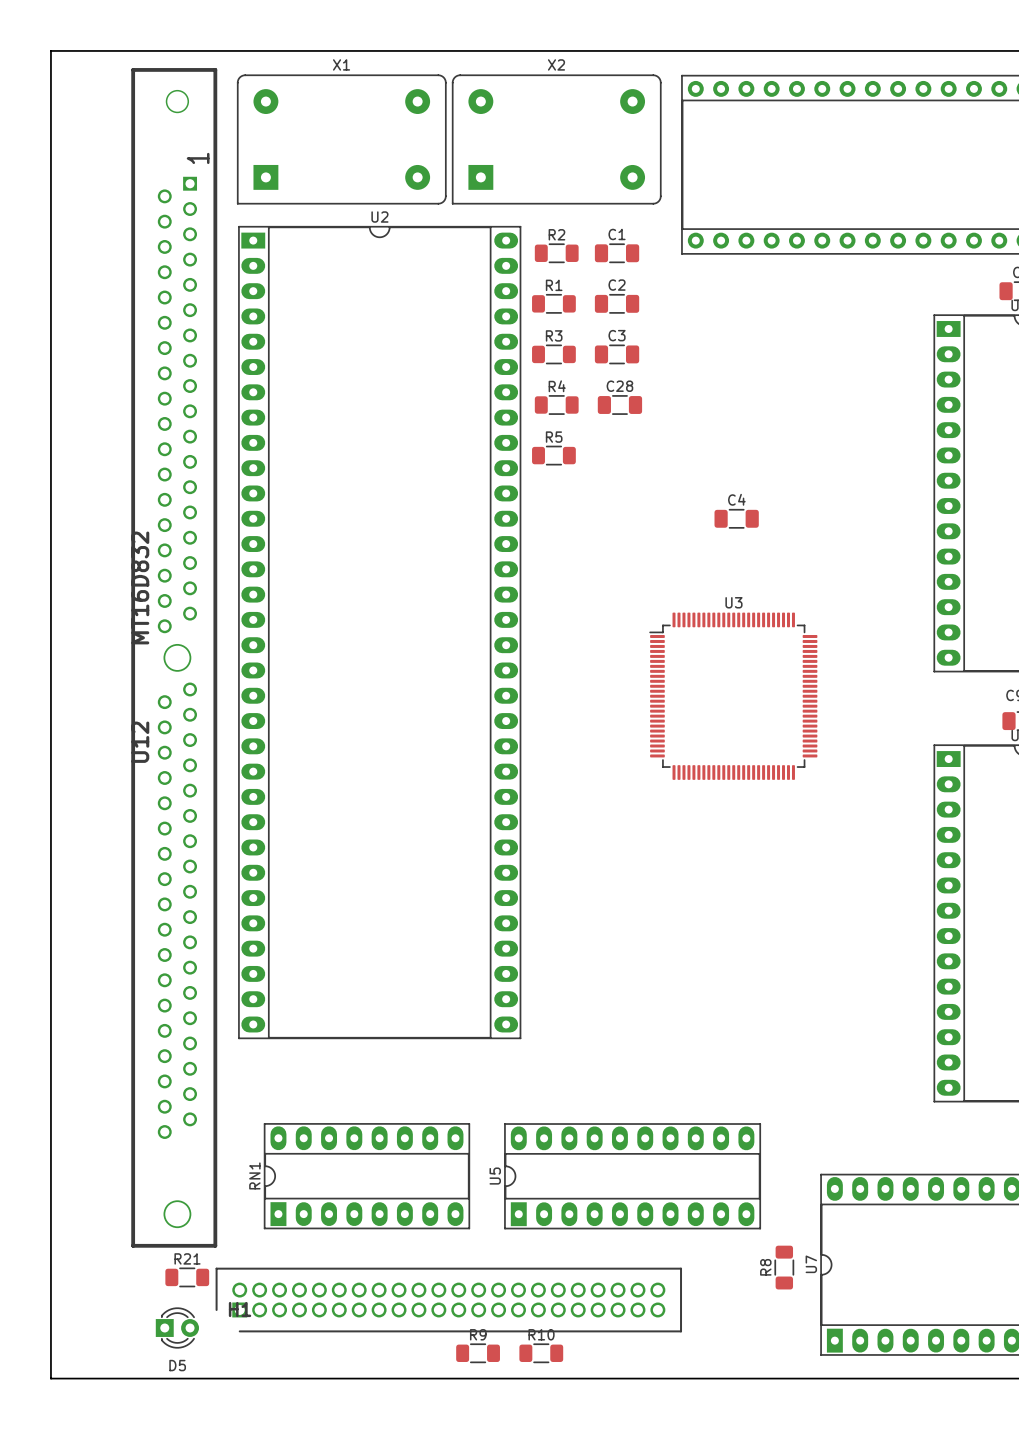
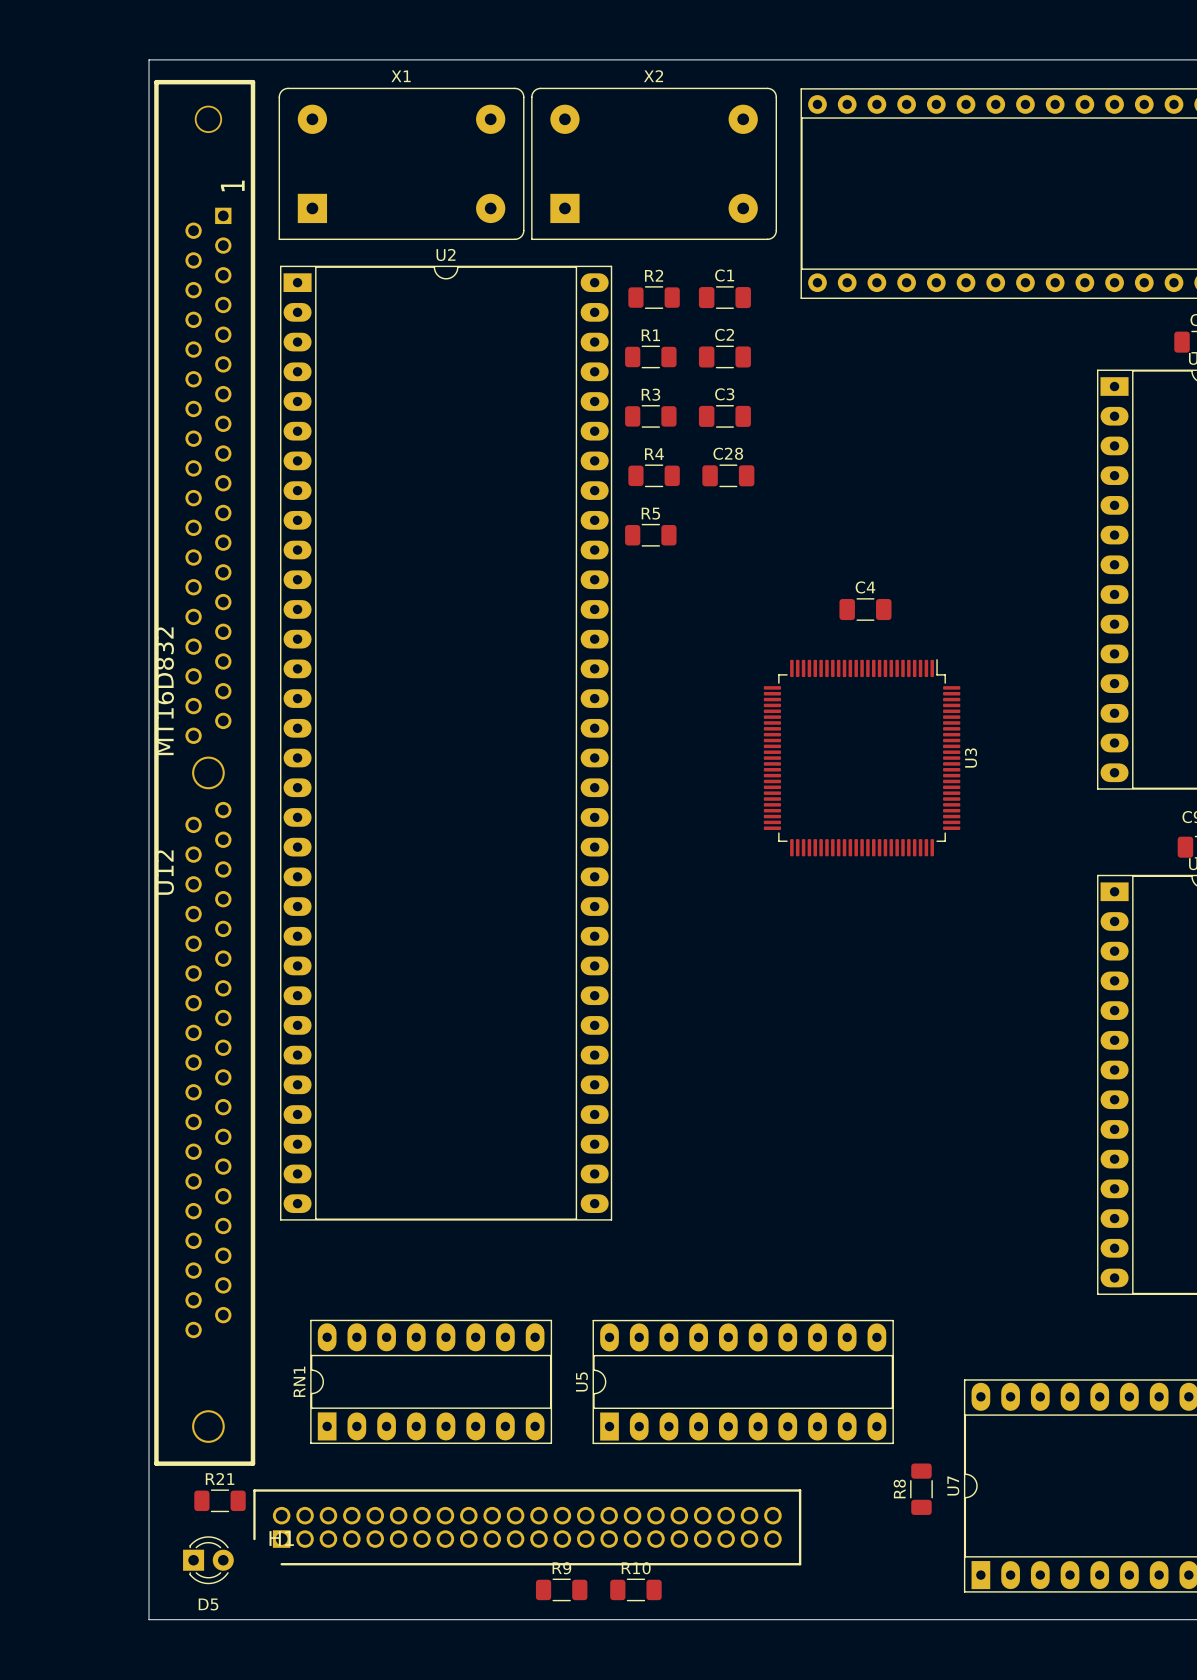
board edge: (126, 50) (50, 50) (50, 1378) (126, 1378) -> (149, 59) (149, 1619)
U3 rotation: 0° (733, 696) -> 90° clockwise (862, 757)

